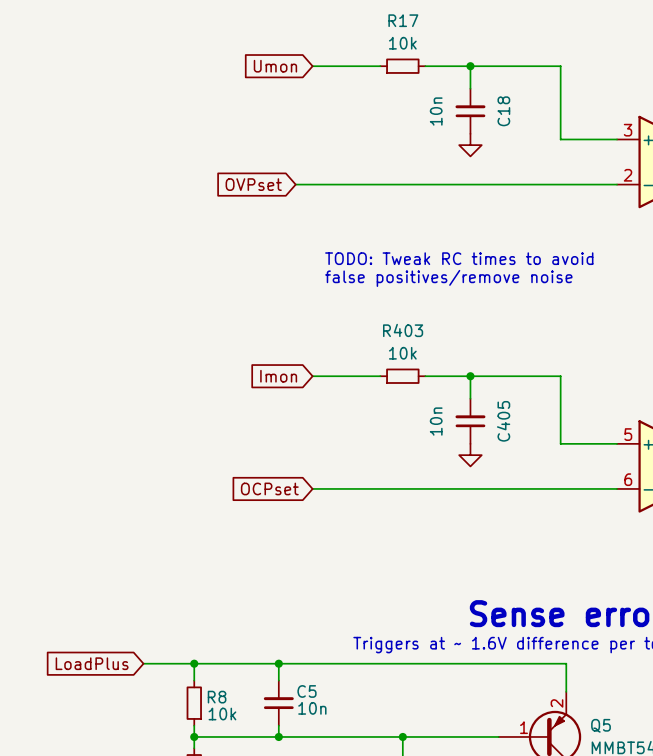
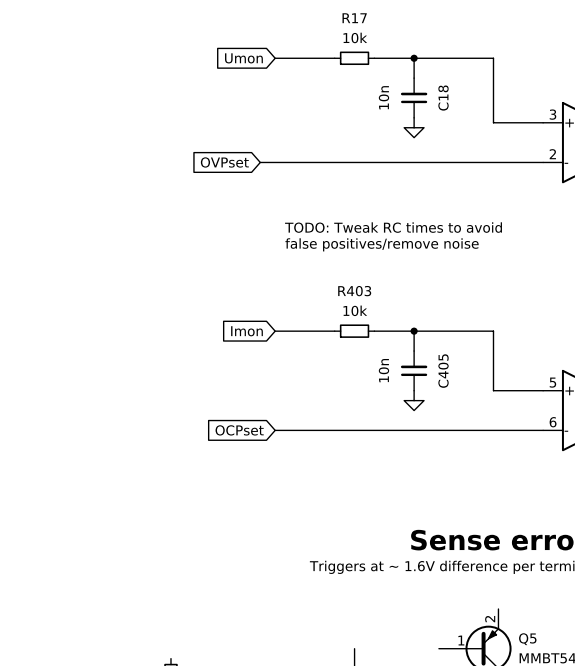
global label: LoadPlus (92, 663) -> none
wire: (143, 663) (566, 663) (566, 691) -> none
wire: (194, 663) (194, 680) -> none
junction: (194, 663) -> none
wire: (278, 663) (278, 680) -> none
junction: (278, 663) -> none
R8: 10k (194, 703) -> none
C5: 10n (278, 703) -> none
wire: (194, 725) (194, 748) -> none
wire: (278, 725) (278, 736) -> none
wire: (194, 736) (498, 736) -> none
junction: (194, 736) -> none
junction: (278, 736) -> none
junction: (402, 736) -> none

